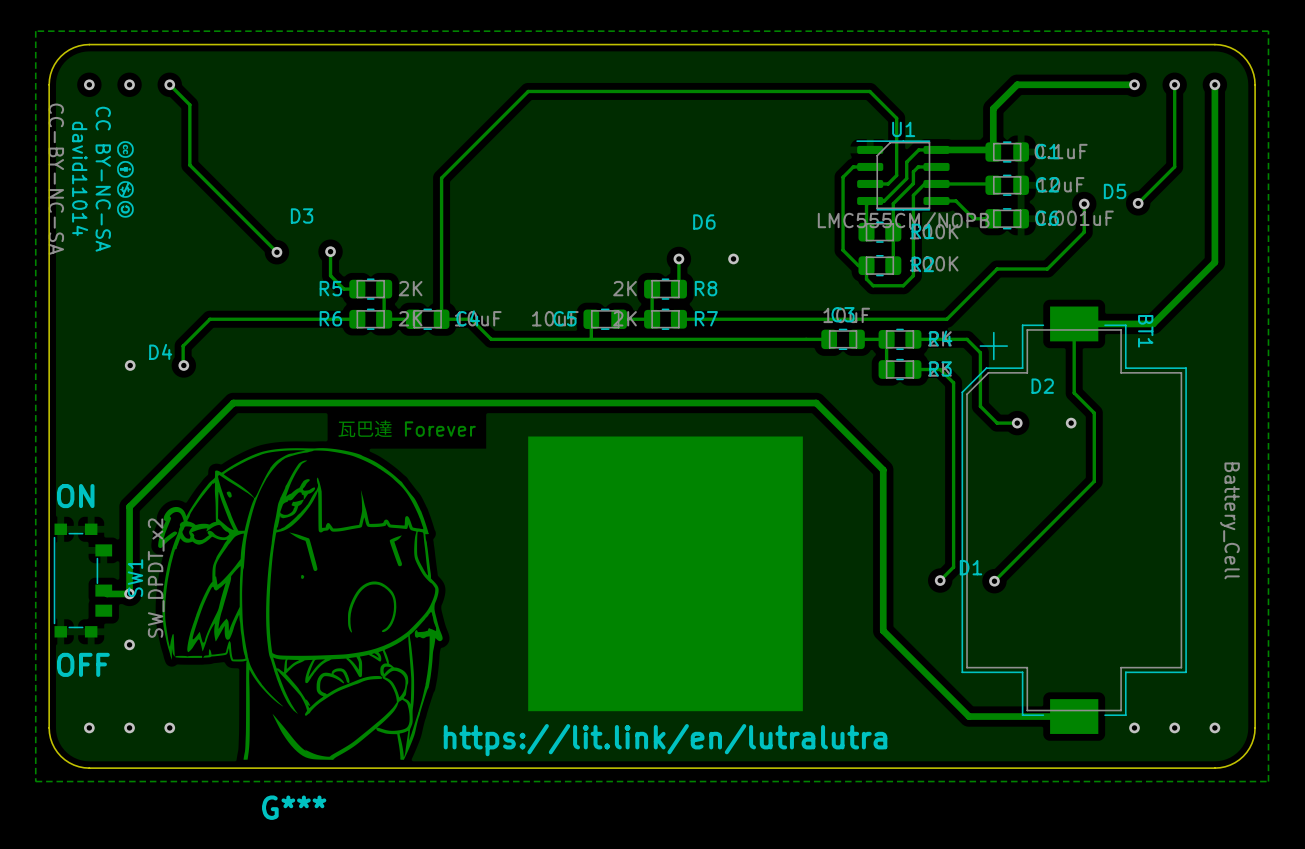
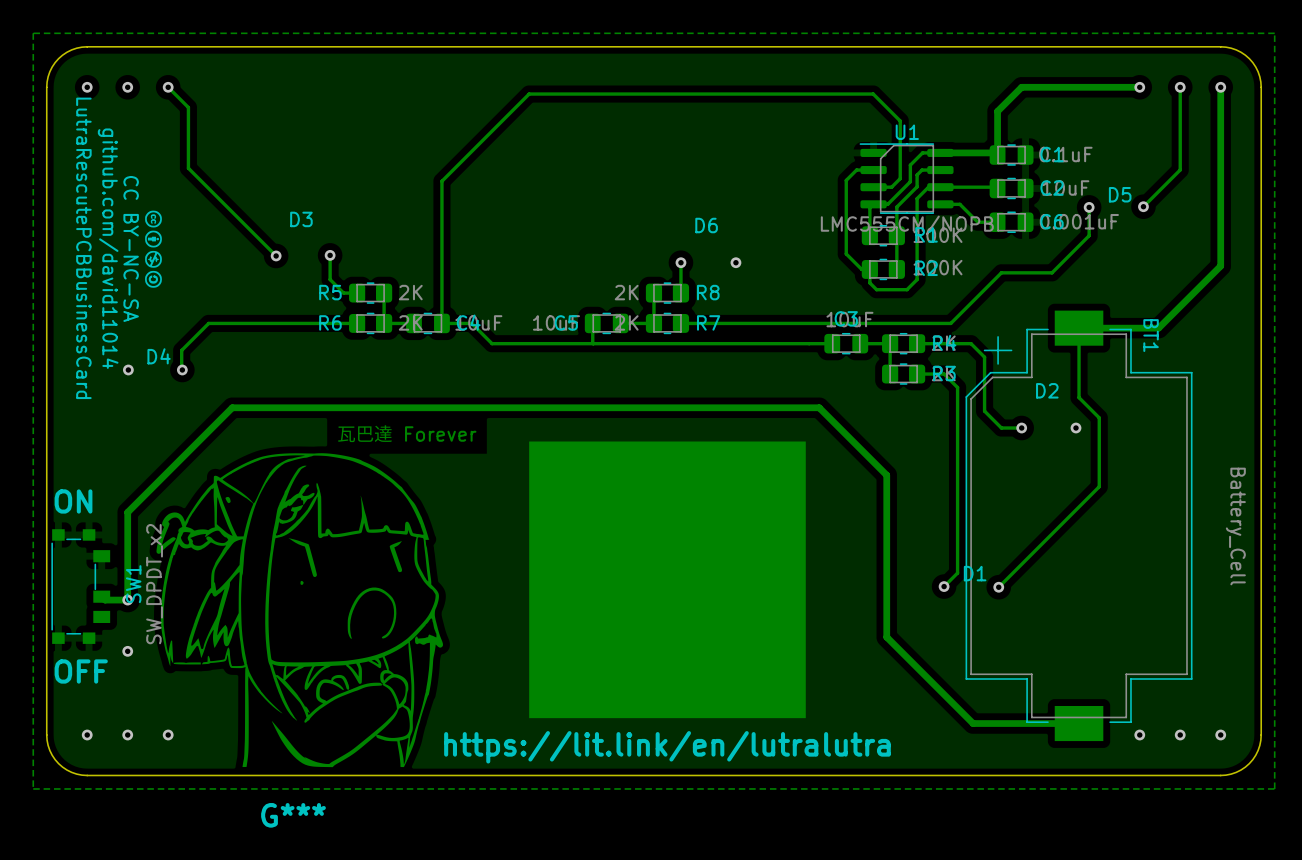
david11014: CC-BY-NC-SA (125, 179) -> none
LutraRescutePCBBusinessCard: none -> (153, 249)

